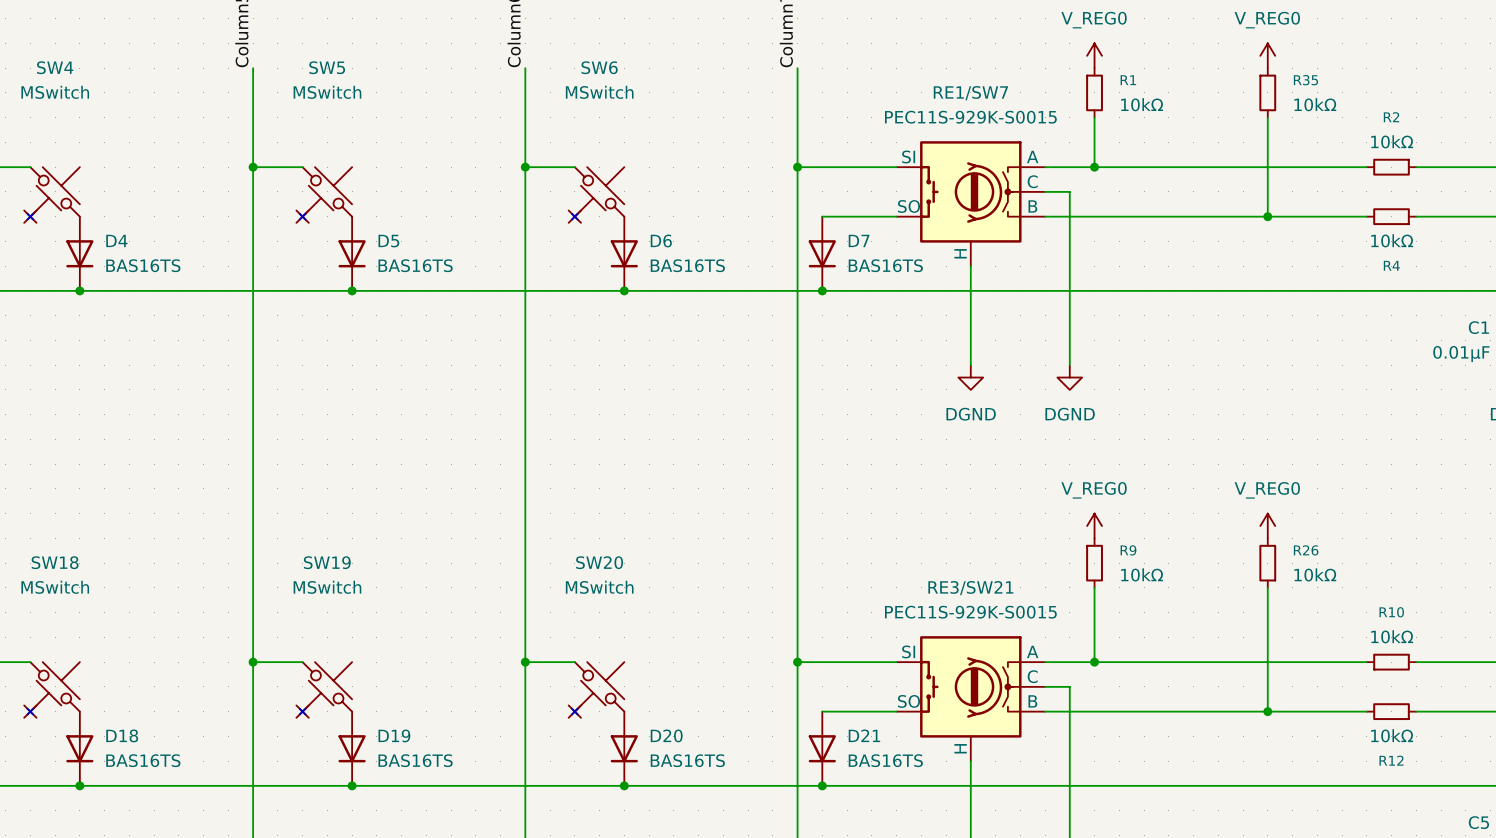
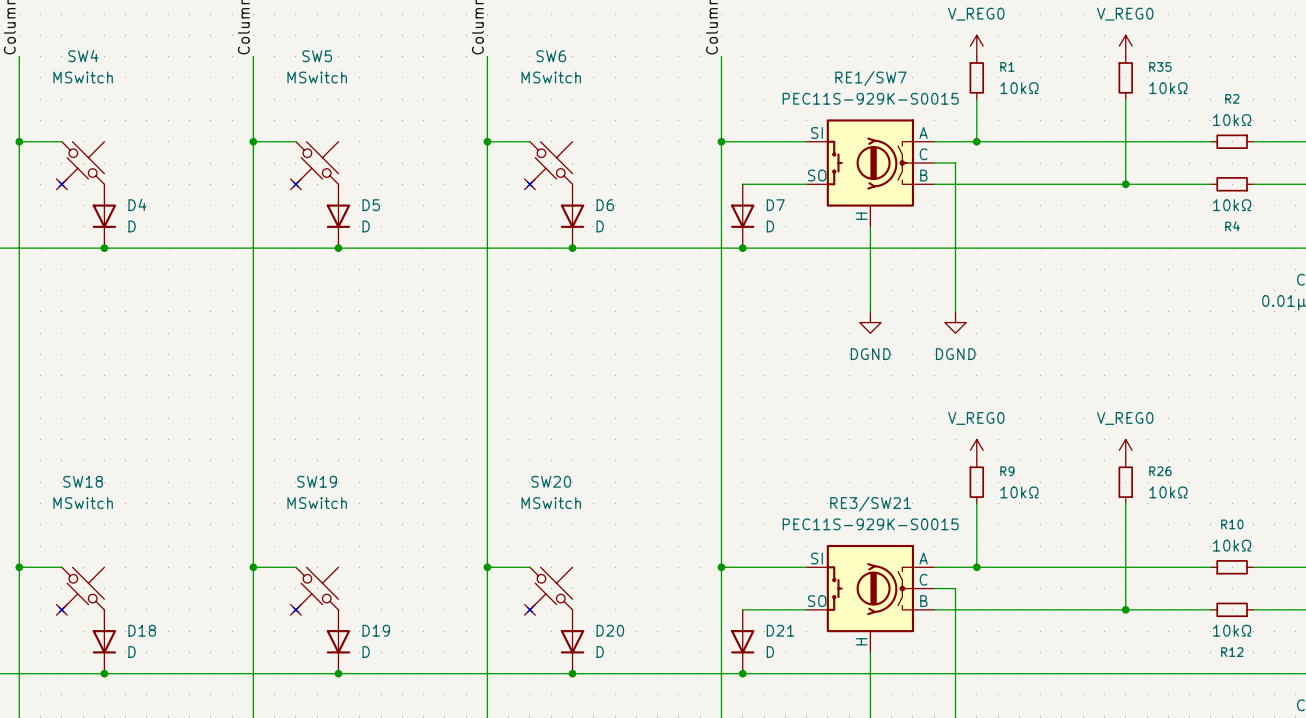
D4 value: BAS16TS (143, 265) -> D (132, 226)
D5 value: BAS16TS (415, 265) -> D (366, 226)
D6 value: BAS16TS (687, 265) -> D (600, 226)
D7 value: BAS16TS (885, 265) -> D (770, 226)
D18 value: BAS16TS (143, 760) -> D (132, 652)
D19 value: BAS16TS (415, 760) -> D (366, 652)
D20 value: BAS16TS (687, 760) -> D (600, 652)
D21 value: BAS16TS (885, 760) -> D (770, 652)

